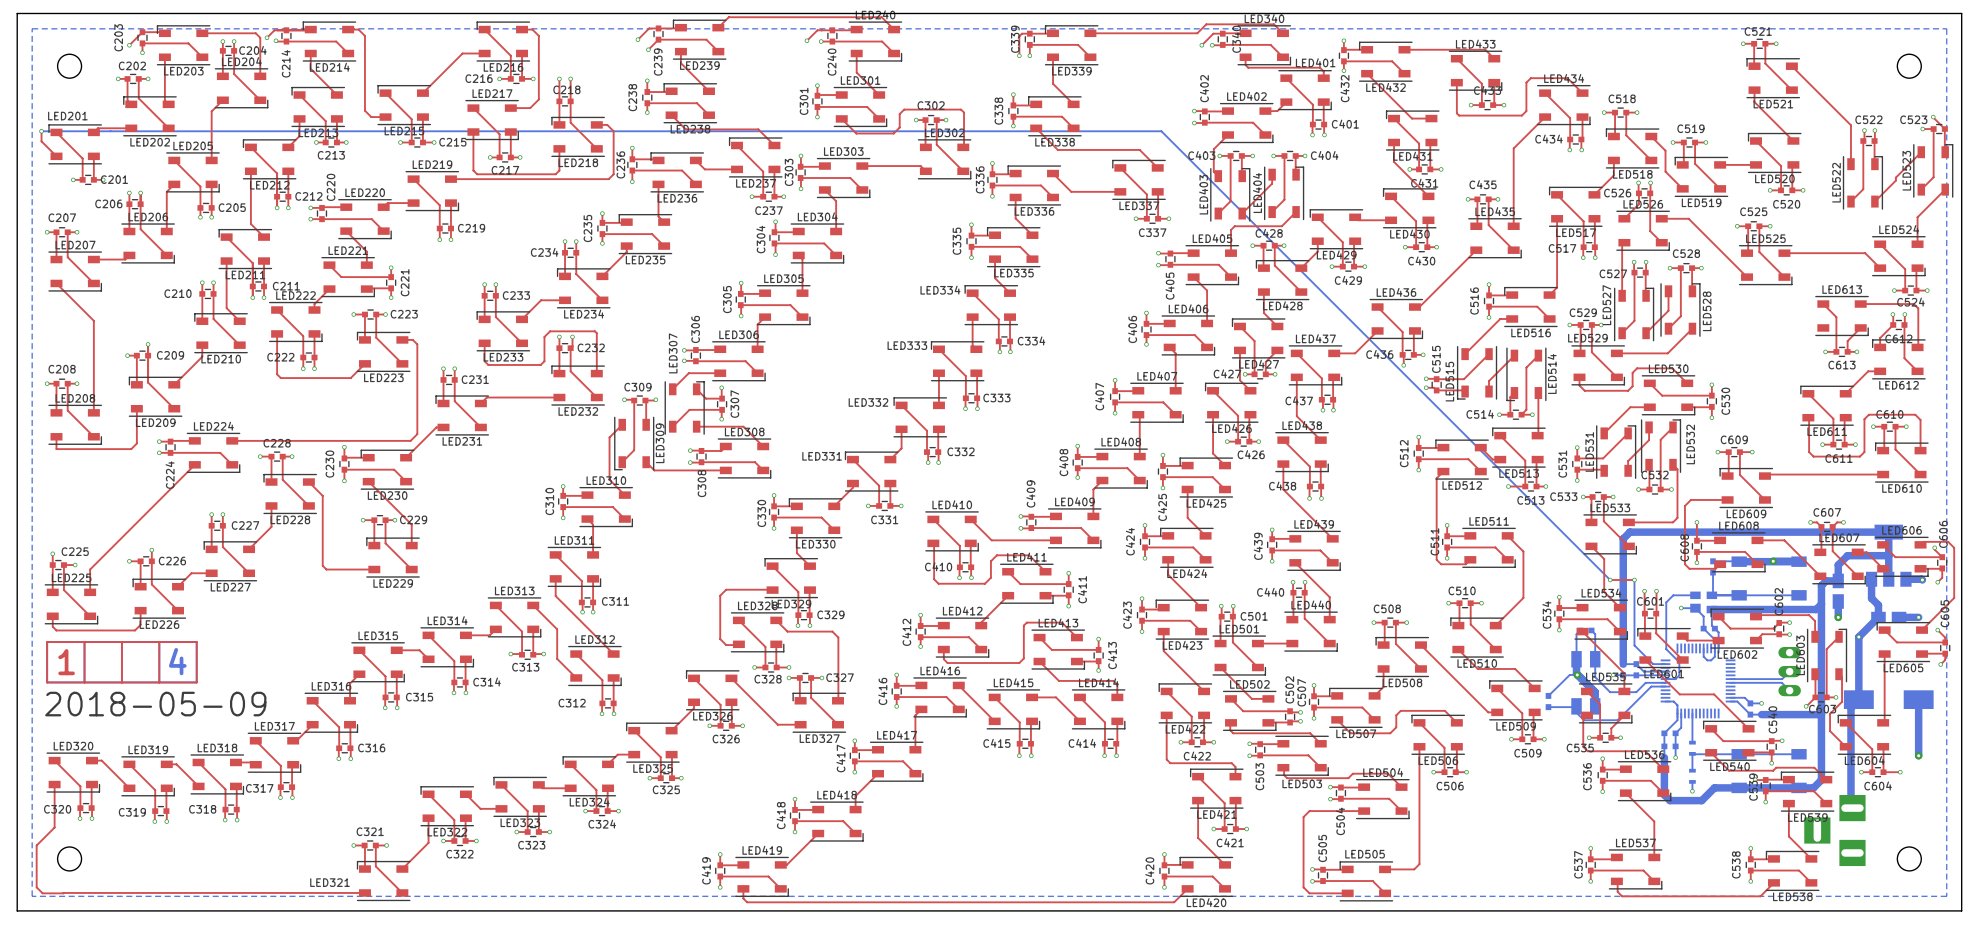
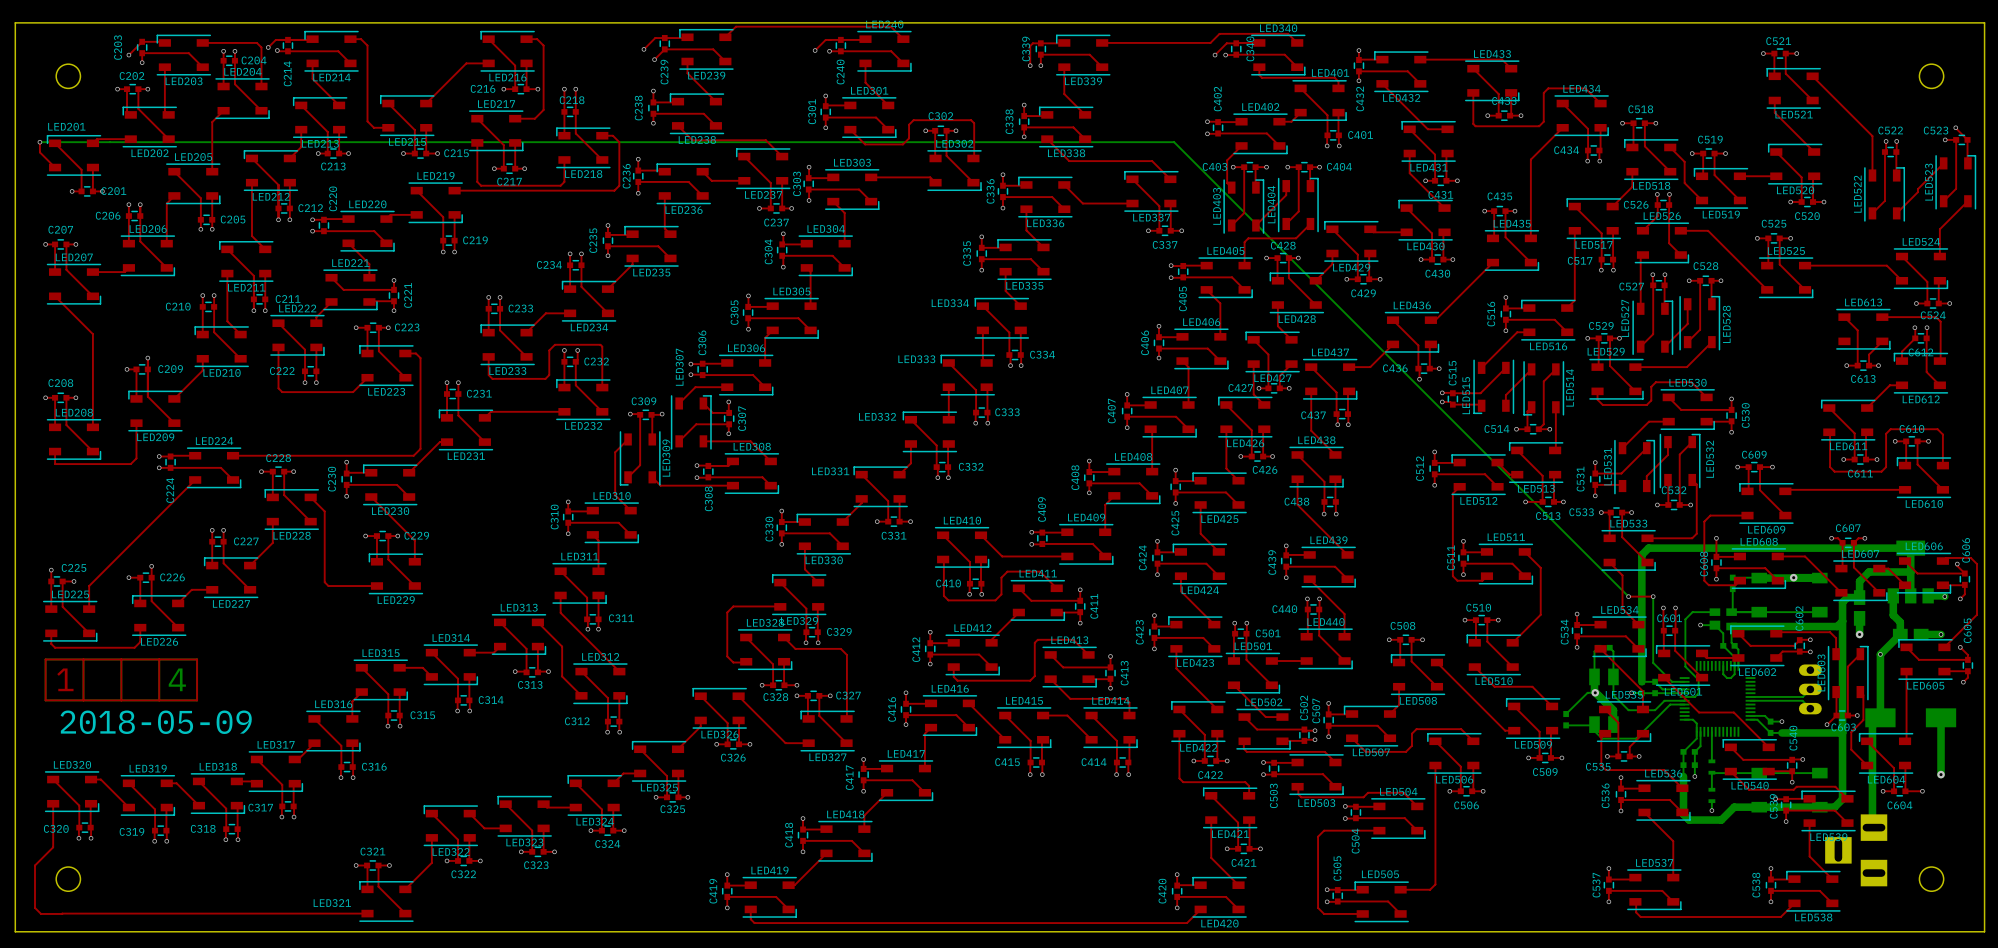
bottom zone outline: (32, 28) (32, 896) (1946, 896) (1946, 28) (32, 28) -> none

